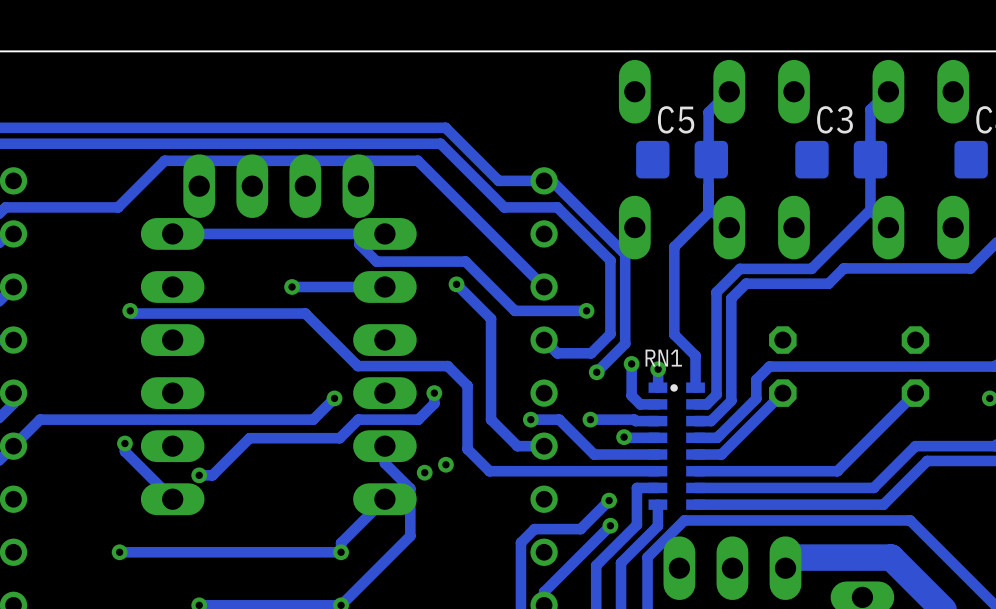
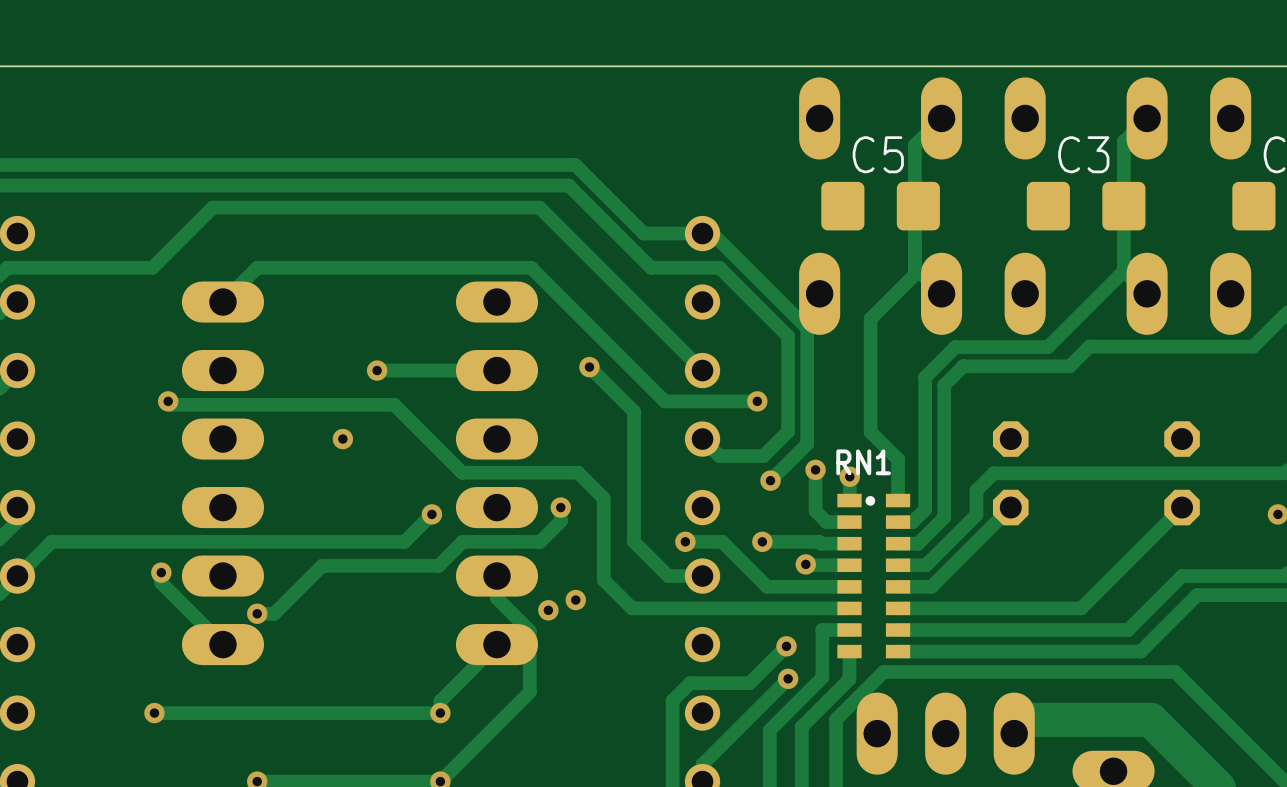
part: (278, 186) -> none
track: (172, 233) (358, 233) (359, 244) (376, 261) (465, 261) -> (222, 302) (257, 267) (531, 267) (601, 337)
via: none -> (342, 439)

